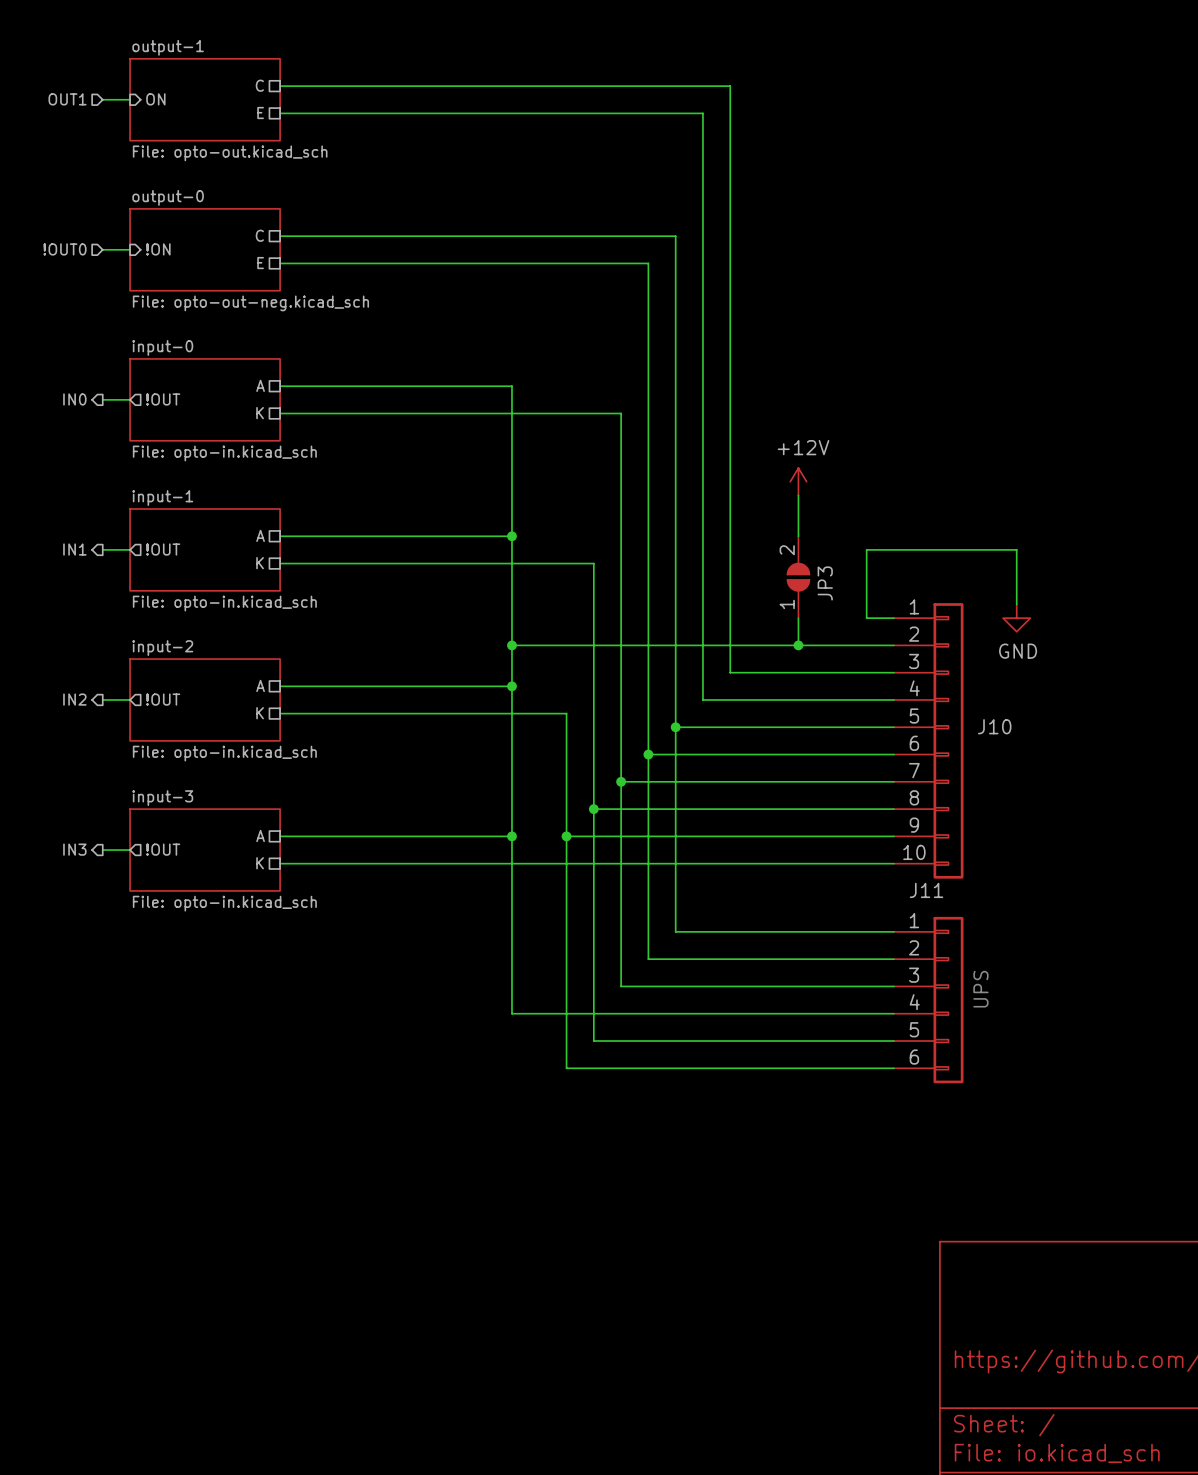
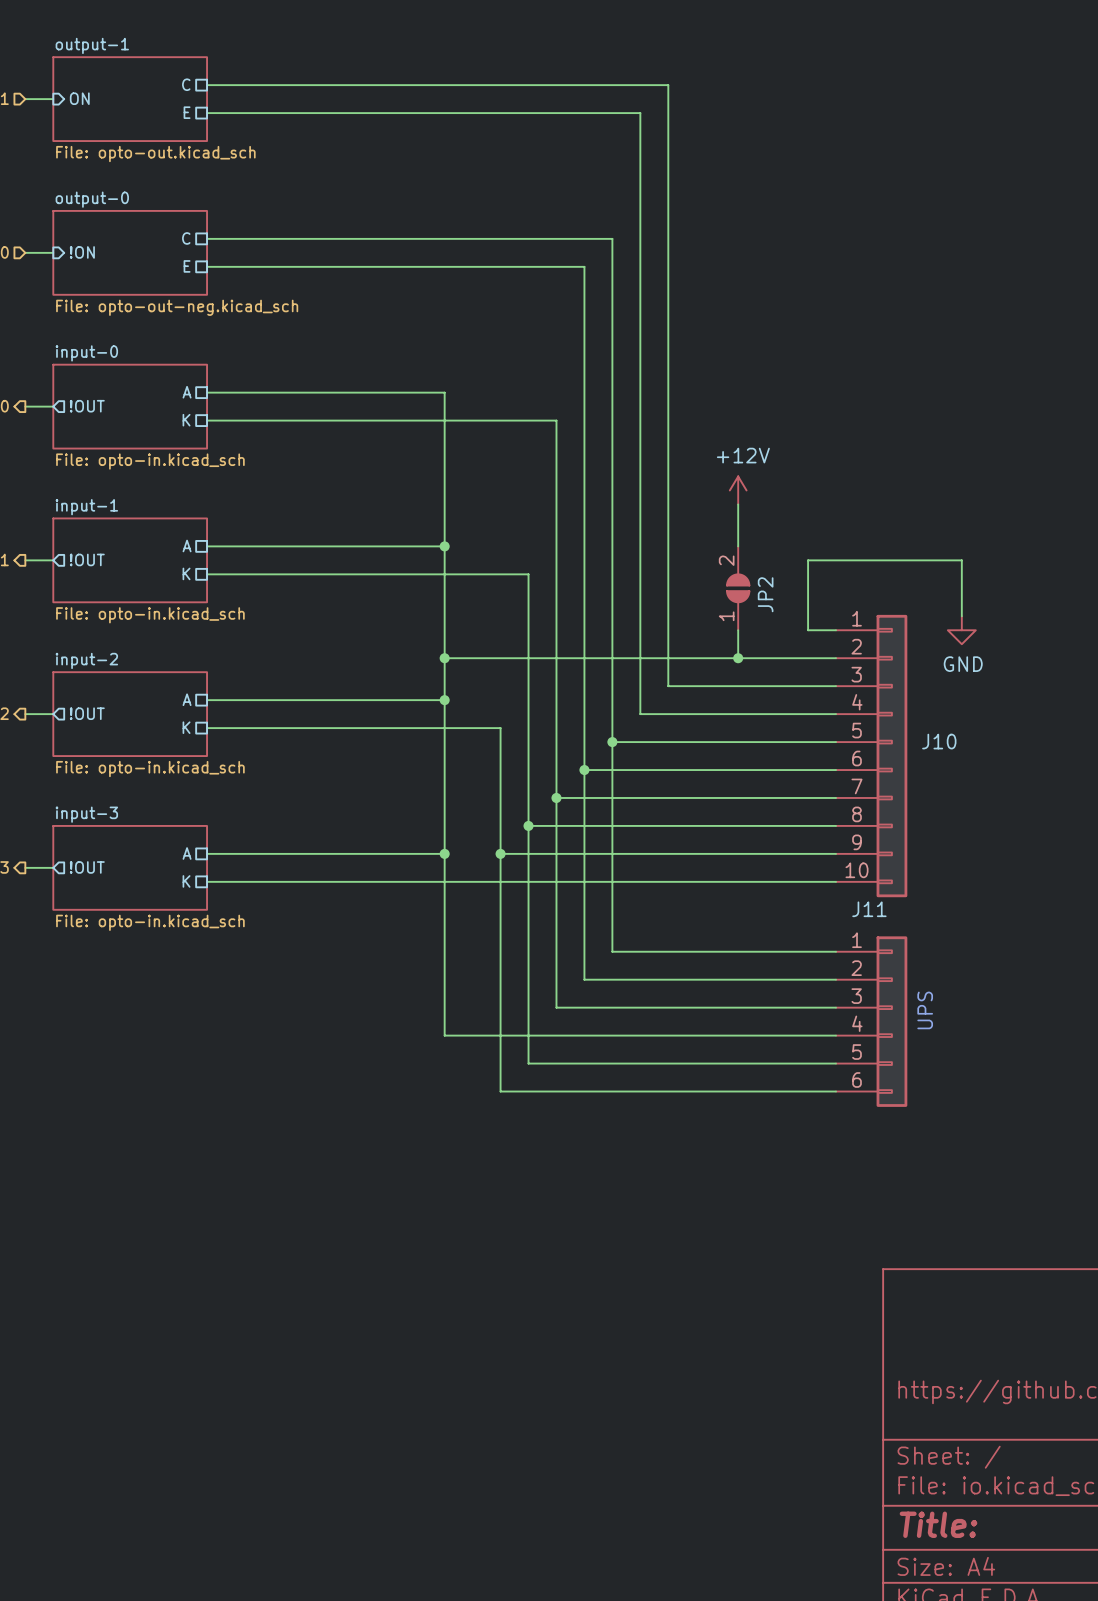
JP3 name: JP3 (825, 583) -> JP2 (765, 594)

